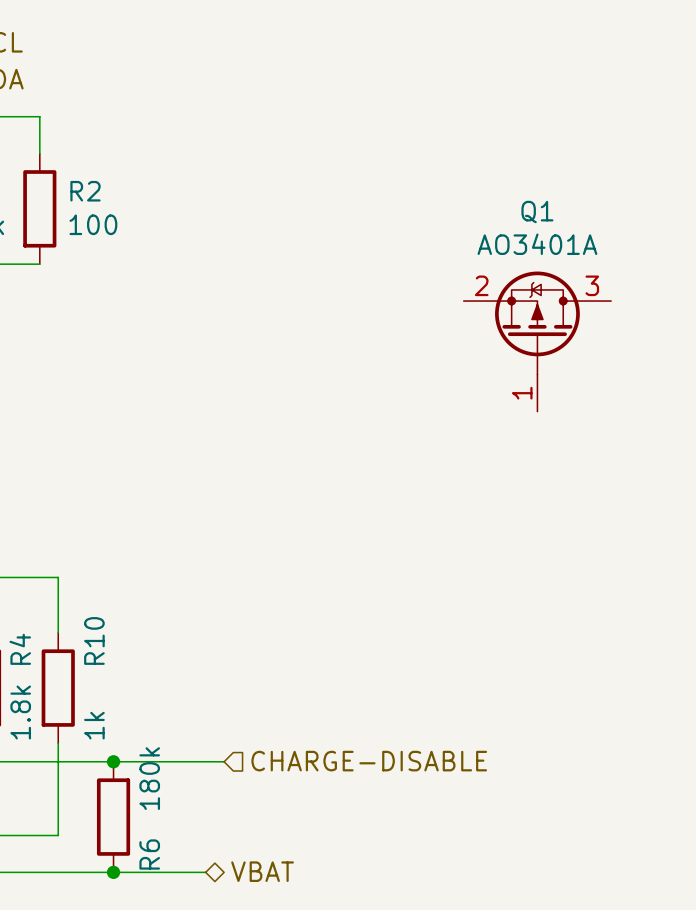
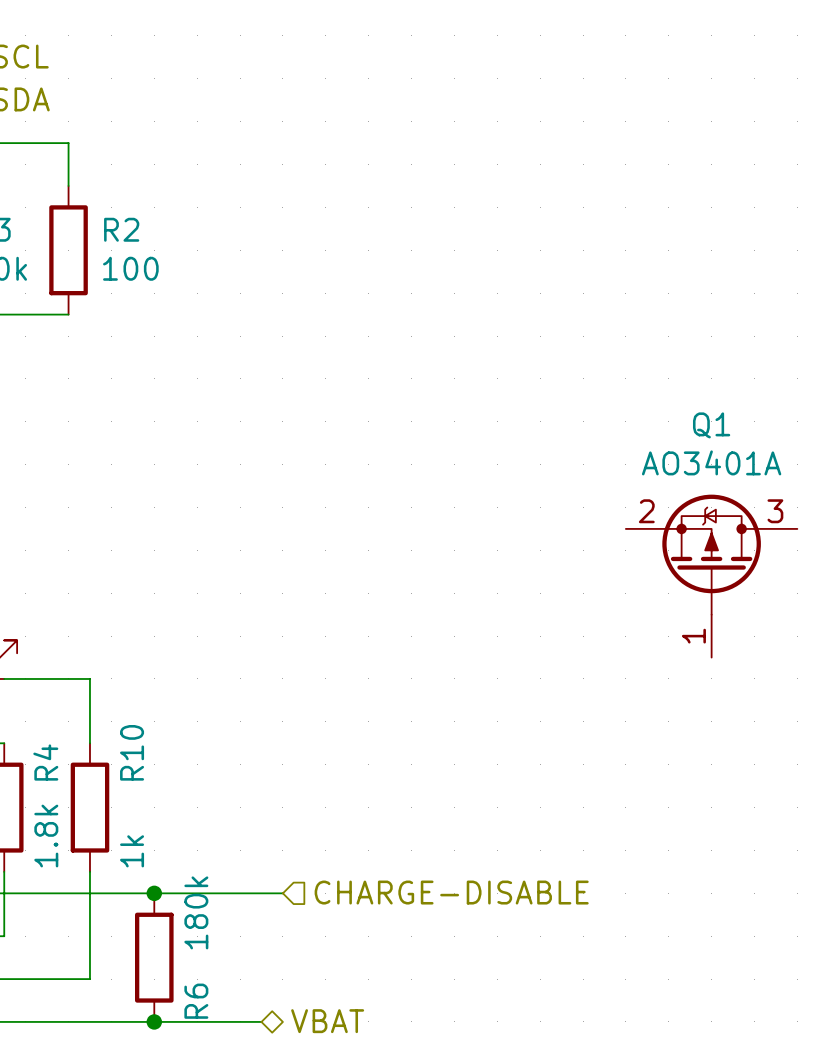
Q1 position: (537, 341) -> (711, 576)

